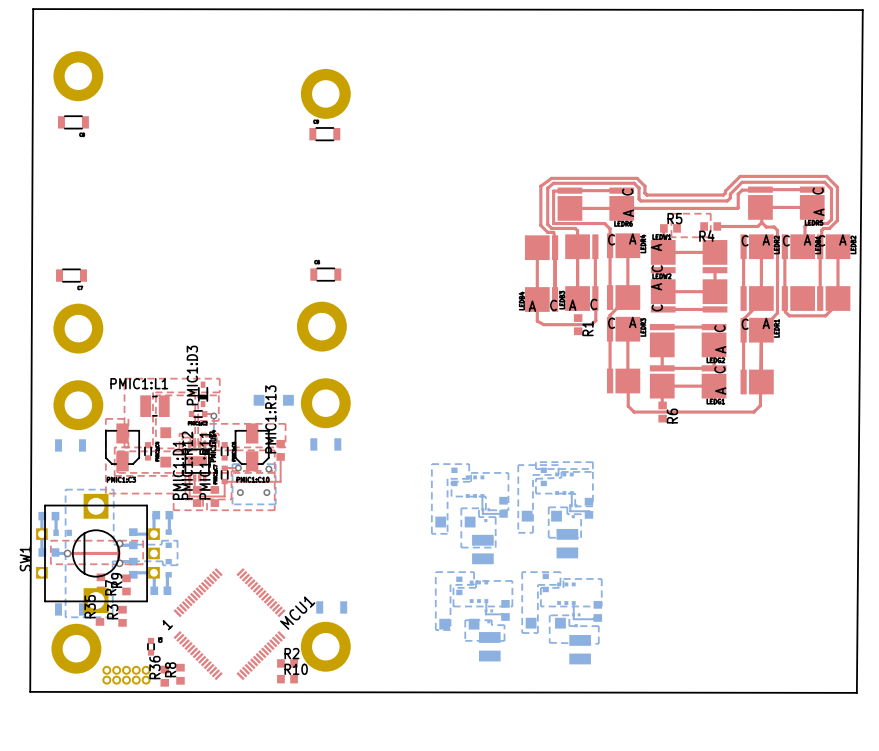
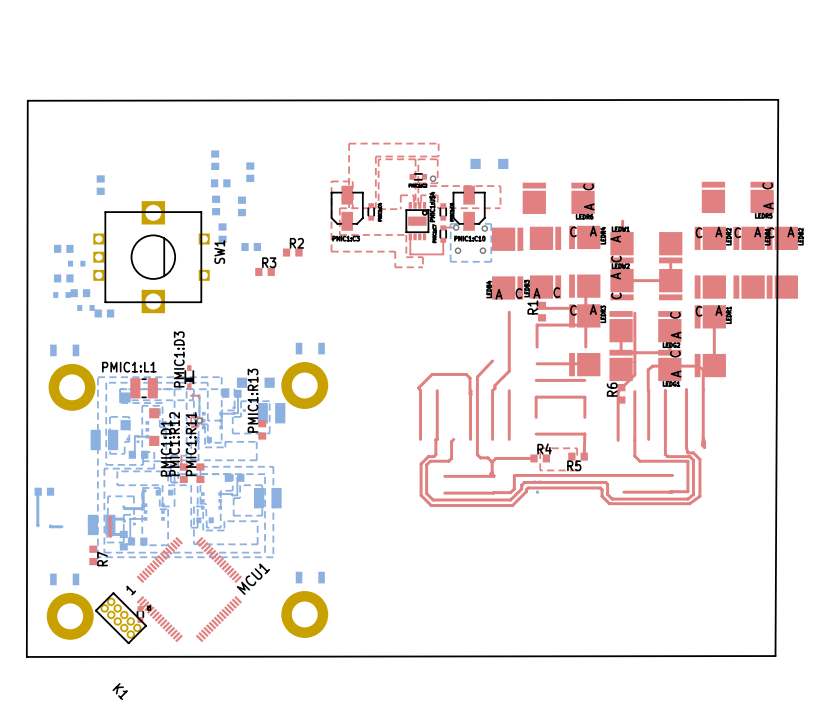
board edge: (33, 9) (862, 10) (856, 692) (30, 691) (33, 9) -> (778, 99) (27, 100) (26, 656) (775, 656) (778, 99)
part: (78, 76) -> none
part: (325, 93) -> none
part: (73, 122) -> none
part: (324, 134) -> none
top zone outline: none -> (378, 159) (415, 159) (415, 206) (413, 206) (413, 195) (400, 195) (400, 209) (378, 209) (378, 159)
top zone outline: none -> (418, 159) (437, 159) (437, 183) (418, 183) (418, 159)
part: none -> (215, 160)
part: none -> (489, 163)
part: none -> (250, 172)
via: none -> (433, 178)
part: none -> (220, 183)
top track: (812, 189) (742, 190) (738, 194) (737, 208) (569, 208) -> none
part: none -> (100, 185)
top track: (569, 190) (621, 190) -> none
top track: (572, 190) (553, 191) (553, 223) (604, 223) (610, 228) (610, 297) -> none
top zone outline: none -> (418, 186) (418, 206) (421, 206) (421, 195) (437, 195) (437, 208) (500, 208) (500, 186) (418, 186)
top track: (812, 207) (760, 207) (761, 222) -> none
part: none -> (216, 205)
part: none -> (241, 206)
top zone outline: (671, 213) (671, 237) (710, 237) (710, 213) (671, 213) -> none
top zone outline: none -> (349, 208) (349, 143) (438, 143) (438, 156) (375, 156) (375, 208) (339, 208) (339, 235) (406, 235) (406, 257) (422, 257) (422, 267) (395, 267) (395, 251) (331, 251) (331, 181) (352, 181) (352, 208)
R5 name position: R5 (674, 218) -> R5 (574, 465)
top track: (761, 222) (766, 227) (774, 227) (777, 230) (777, 313) (761, 330) (760, 405) (753, 412) (634, 412) (628, 406) (627, 329) -> none
top track: (761, 222) (757, 226) (717, 226) -> none
R4 position: (710, 226) -> (540, 458)
R5 position: (670, 228) -> (578, 456)
bottom zone outline: none -> (450, 223) (491, 223) (491, 261) (450, 261) (450, 223)
top track: none -> (452, 227) (443, 227)
via: none -> (456, 227)
via: none -> (484, 228)
R4 name position: R4 (706, 236) -> R4 (544, 449)
part: none -> (222, 233)
top track: none -> (410, 236) (410, 254) (443, 254) (443, 240)
top track: (627, 245) (627, 297) (610, 315) (610, 381) -> none
top track: (595, 246) (595, 320) (590, 324) (543, 324) (537, 321) (537, 247) -> none
top track: (743, 246) (743, 298) -> none
top track: (761, 246) (761, 298) (758, 304) (743, 319) (743, 381) -> none
top track: (784, 246) (784, 298) (784, 298) (784, 294) (785, 295) (785, 311) (789, 315) (825, 315) (839, 301) (837, 298) (837, 246) -> none
top track: (802, 246) (805, 244) (805, 226) (807, 223) (827, 223) (831, 219) (831, 189) (824, 182) (742, 182) (730, 194) (730, 198) (727, 200) (641, 200) (639, 198) (639, 188) (634, 183) (553, 183) (547, 188) (547, 224) (551, 228) (575, 228) (577, 230) (577, 298) -> none
top track: (663, 252) (715, 252) -> none
part: none -> (251, 247)
part: none -> (63, 248)
via: none -> (458, 250)
via: none -> (482, 250)
part: none -> (76, 263)
part: (325, 274) -> none
part: (71, 275) -> none
part: none -> (63, 278)
top track: (820, 298) (821, 230) (829, 228) (837, 220) (837, 187) (826, 176) (740, 176) (723, 195) (646, 195) (644, 186) (637, 178) (551, 178) (540, 186) (540, 225) (547, 232) (553, 232) (555, 237) (555, 299) -> none
top track: none -> (585, 290) (585, 308) (537, 308)
part: none -> (80, 293)
part: none -> (61, 295)
top track: (663, 309) (715, 309) -> (537, 363) (585, 363)
part: none -> (85, 307)
top track: none -> (509, 312) (509, 371) (494, 385) (492, 390) (492, 439)
part: none -> (104, 313)
part: (321, 326) -> none
top track: none -> (634, 313) (634, 374) (618, 391) (618, 440)
top track: (662, 327) (714, 327) -> (536, 380) (584, 380)
part: (78, 328) -> none
R1 name position: R1 (587, 328) -> R1 (532, 307)
top track: none -> (537, 347) (537, 325) (585, 325) (585, 347)
top track: none -> (492, 360) (477, 377) (477, 454) (480, 457) (487, 457) (492, 462)
top track: (714, 386) (662, 386) (662, 405) -> none
top zone outline: (155, 395) (195, 395) (195, 445) (193, 445) (193, 433) (179, 433) (179, 448) (155, 448) (155, 395) -> none
top zone outline: (198, 395) (218, 395) (218, 420) (198, 420) (198, 395) -> none
bottom zone outline: none -> (174, 389) (174, 425) (162, 425) (162, 403) (120, 403) (120, 389) (193, 389) (193, 419) (198, 419) (198, 460)
bottom zone outline: none -> (186, 389) (186, 455) (170, 455) (170, 482) (178, 482) (178, 460) (256, 460) (256, 441) (225, 441) (225, 447) (205, 447) (205, 426) (191, 426) (191, 460)
bottom zone outline: none -> (193, 389) (193, 400) (120, 400)
top track: none -> (686, 389) (686, 447) (687, 452) (693, 452) (699, 459) (699, 496) (689, 503) (609, 503) (602, 496) (600, 488) (528, 488) (512, 505) (431, 505) (421, 495) (421, 463) (428, 456) (435, 454) (437, 390)
top track: none -> (509, 390) (509, 439)
top track: none -> (665, 390) (665, 454) (667, 456) (689, 456) (693, 460) (693, 494) (687, 499) (612, 499) (607, 494) (607, 484) (605, 482) (524, 482) (521, 488) (510, 500) (433, 500) (426, 493) (426, 464) (430, 461) (448, 461) (451, 458) (451, 441) (453, 439)
top track: none -> (634, 391) (634, 456) (639, 461) (687, 461) (687, 491) (670, 492)
part: none -> (231, 393)
bottom track: none -> (237, 393) (237, 413) (221, 413)
part position: (198, 414) -> (418, 176)
via: (213, 415) -> none
R6 name position: R6 (672, 416) -> R6 (612, 389)
bottom zone outline: none -> (241, 401) (269, 401) (269, 433) (232, 433) (232, 416) (241, 416) (241, 401)
top zone outline: (198, 423) (198, 445) (201, 445) (201, 433) (218, 433) (218, 447) (285, 447) (285, 423) (198, 423) -> none
bottom zone outline: none -> (142, 405) (142, 461) (166, 461) (166, 427) (159, 427) (159, 405) (142, 405)
part: none -> (239, 410)
part: none -> (125, 411)
part: none -> (271, 413)
bottom zone outline: none -> (109, 416) (129, 416) (129, 441) (124, 441) (124, 453) (109, 453) (109, 416)
top track: none -> (536, 417) (536, 397) (584, 397) (584, 417)
part: none -> (212, 420)
bottom zone outline: none -> (221, 420) (207, 420) (207, 382) (106, 382) (106, 464) (143, 464) (143, 451) (154, 451) (154, 468) (104, 468) (104, 534)
part position: (325, 444) -> (310, 348)
part position: (70, 445) -> (64, 350)
part position: (122, 447) -> (347, 208)
top zone outline: (124, 447) (124, 378) (219, 378) (219, 392) (152, 392) (152, 447) (114, 447) (114, 475) (185, 475) (185, 499) (203, 499) (203, 510) (173, 510) (173, 493) (105, 493) (105, 418) (128, 418) (128, 447) -> none
part position: (252, 447) -> (469, 208)
part: none -> (156, 429)
part position: (148, 451) -> (371, 211)
part position: (224, 451) -> (443, 211)
top track: none -> (536, 434) (584, 434)
top track: none -> (584, 434) (584, 456)
top track: (280, 456) (280, 481) (224, 481) -> none
bottom track: none -> (147, 436) (134, 436) (134, 451) (132, 451) (132, 454)
top track: none -> (703, 438) (703, 369) (697, 366) (652, 366) (648, 369) (648, 439)
top track: none -> (703, 438) (702, 445) (704, 447) (704, 442) (703, 438)
part: none -> (133, 439)
top track: none -> (420, 439) (420, 390) (418, 387) (432, 374) (466, 374) (470, 378) (470, 439)
part: none -> (104, 439)
part position: (197, 461) -> (417, 221)
part: none -> (203, 439)
bottom zone outline: (535, 462) (535, 469) (592, 469) (592, 462) (535, 462) -> none
bottom zone outline: (232, 464) (232, 504) (275, 504) (275, 464) (237, 464) -> (217, 442) (207, 442) (207, 424) (199, 424) (199, 389) (234, 389) (234, 410) (221, 410)
bottom zone outline: none -> (221, 442) (221, 377) (97, 377) (97, 557) (273, 557) (273, 466) (200, 466) (200, 503) (205, 503) (206, 527) (220, 527) (220, 490) (232, 490) (232, 474)
bottom zone outline: (431, 464) (469, 464) (469, 478) (447, 478) (447, 533) (431, 533) (431, 464) -> none
bottom zone outline: (518, 465) (558, 465) (558, 474) (533, 474) (533, 532) (518, 532) (518, 465) -> none
top track: (234, 468) (224, 468) -> none
via: (238, 468) -> none
via: (268, 469) -> none
top zone outline: none -> (540, 448) (577, 448) (577, 470) (540, 470) (540, 448)
top zone outline: (274, 470) (231, 470) (231, 499) (206, 499) (206, 510) (274, 510) (274, 450) (190, 450) (190, 437) (182, 437) (182, 451) (117, 451) (117, 472) (274, 472) -> none
bottom zone outline: (561, 471) (561, 477) (535, 478) (535, 493) (575, 493) (575, 506) (592, 506) (592, 471) (561, 471) -> none
bottom zone outline: (471, 472) (471, 481) (451, 481) (451, 496) (485, 496) (485, 510) (508, 510) (508, 472) (471, 472) -> none
part position: (224, 474) -> (443, 234)
part: none -> (138, 454)
part: (454, 476) -> none
part: (543, 476) -> none
top track: (189, 477) (189, 496) (224, 496) (224, 481) -> none
top track: none -> (534, 458) (495, 458) (492, 462)
part: (564, 483) -> none
top track: none -> (492, 462) (493, 476) (444, 476)
part: (475, 486) -> none
via: (240, 492) -> none
via: (266, 492) -> none
bottom track: (571, 493) (570, 511) (588, 511) (588, 514) -> none
bottom zone outline: none -> (117, 471) (174, 471) (174, 506) (162, 506) (162, 485) (117, 485) (117, 471)
bottom track: (482, 495) (482, 513) (503, 513) -> none
top track: none -> (492, 472) (490, 474)
bottom zone outline: none -> (168, 474) (197, 474) (197, 527) (191, 527) (191, 485) (168, 485) (168, 474)
top track: none -> (672, 475) (514, 475) (514, 488) (510, 492) (444, 493)
part: none -> (234, 477)
bottom track: none -> (240, 477) (237, 477) (237, 495) (220, 494)
part: (503, 507) -> none
bottom zone outline: (548, 507) (548, 537) (581, 537) (581, 514) (567, 514) (567, 507) (548, 507) -> none
bottom zone outline: (461, 508) (461, 547) (495, 547) (495, 517) (478, 517) (478, 508) (461, 508) -> none
part: (588, 508) -> none
bottom zone outline: none -> (240, 485) (262, 485) (262, 515) (233, 515) (233, 498) (240, 498) (240, 485)
bottom zone outline: none -> (142, 488) (142, 545) (168, 545) (168, 509) (159, 509) (159, 488) (142, 488)
part: (162, 515) -> none
bottom track: (169, 515) (168, 532) -> none
part: (485, 515) -> none
bottom track: (55, 516) (56, 532) -> none
part: (541, 516) -> none
top track: none -> (623, 492) (672, 492)
part: none -> (164, 492)
bottom zone outline: none -> (108, 496) (133, 496) (133, 514) (123, 514) (123, 542) (107, 542) (108, 496)
part: (455, 522) -> none
part: none -> (267, 498)
part: none -> (211, 500)
part footprint: [165, 529, 172, 549] -> [143, 503, 165, 521]
bottom zone outline: none -> (193, 506) (203, 506) (203, 530) (224, 530) (224, 521) (257, 521) (257, 544) (193, 544) (193, 506)
part: (62, 532) -> none
part: (133, 538) -> none
top zone outline: (50, 540) (50, 564) (143, 564) (143, 540) (50, 540) -> none
via: (119, 543) -> none
part: (567, 543) -> none
bottom track: none -> (145, 518) (130, 518) (131, 541)
part: none -> (205, 520)
part: none -> (129, 521)
part: (482, 549) -> none
part: none -> (101, 524)
part: (48, 552) -> none
top track: (67, 553) (118, 553) -> none
via: (67, 553) -> none
SW1 rotation: 0° (97, 553) -> 180° (151, 257)
SW1 position: (97, 553) -> (151, 257)
bottom zone outline: (112, 561) (162, 561) (162, 565) (177, 565) (177, 540) (161, 540) (161, 544) (113, 544) (113, 489) (65, 489) (65, 617) (112, 617) (112, 580) -> (200, 474) (265, 474) (265, 552) (104, 552)
via: (119, 563) -> none
part: (168, 568) -> none
part: none -> (137, 541)
bottom zone outline: (435, 572) (474, 572) (474, 584) (450, 584) (450, 630) (435, 630) (435, 572) -> none
bottom zone outline: (522, 572) (560, 572) (560, 584) (537, 584) (537, 633) (522, 633) (522, 572) -> none
bottom track: (133, 574) (135, 572) (154, 572) (154, 590) -> none
bottom track: (168, 574) (167, 590) -> none
bottom zone outline: (563, 578) (563, 587) (540, 587) (540, 606) (601, 606) (601, 578) (563, 578) -> none
bottom zone outline: (476, 580) (512, 580) (512, 606) (453, 606) (453, 587) (476, 587) (476, 580) -> none
part: (545, 582) -> none
R9: (126, 584) -> none
part: (459, 585) -> none
part: (160, 590) -> none
part: (478, 591) -> none
part: (566, 593) -> none
bottom track: (486, 601) (485, 614) (502, 614) (502, 616) (505, 616) -> none
bottom track: (573, 603) (573, 619) (597, 617) -> none
part: (505, 610) -> none
part: (597, 611) -> none
R35: (99, 615) -> none
bottom zone outline: (549, 615) (549, 642) (598, 643) (598, 626) (569, 626) (569, 615) (549, 615) -> none
R3 rotation: 0° (122, 616) -> 90° clockwise (265, 271)
R3 position: (122, 616) -> (265, 271)
part: (488, 616) -> none
bottom zone outline: (465, 620) (465, 640) (504, 640) (504, 625) (491, 625) (491, 620) (465, 620) -> none
part: (576, 620) -> none
part: (545, 623) -> none
MCU1 position: (229, 624) -> (189, 589)
part: (459, 624) -> none
part: (489, 646) -> none
part: (580, 649) -> none
R2 position: (287, 663) -> (292, 252)
R8: (180, 674) -> none
K1 side: bottom (126, 675) -> top (121, 618)
R36: (164, 676) -> none
R10: (287, 679) -> none

